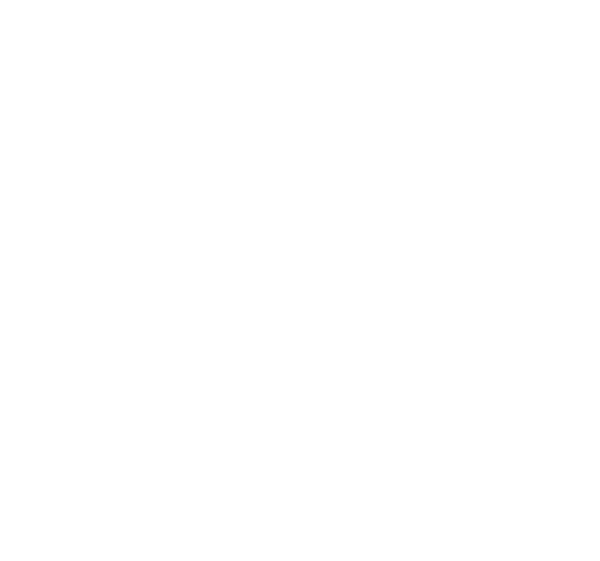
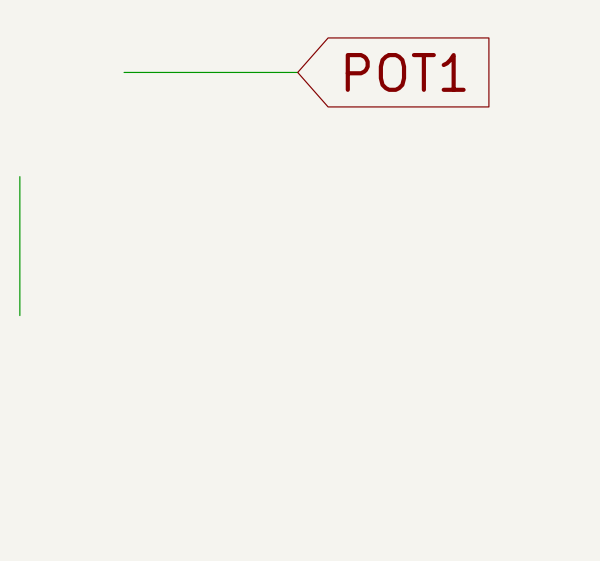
wire: none -> (124, 72) (297, 72)
global label: none -> POT1 (405, 72)
wire: none -> (19, 176) (19, 315)

